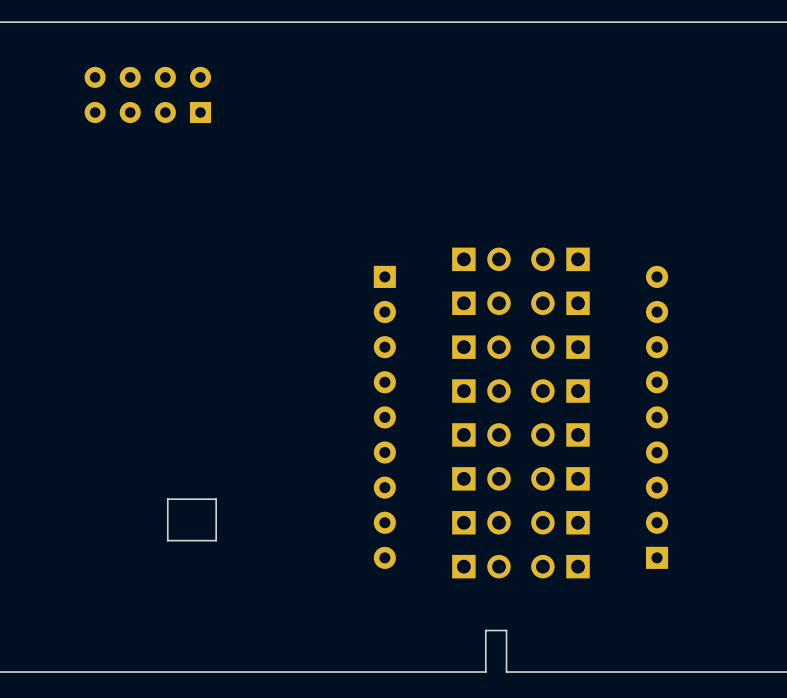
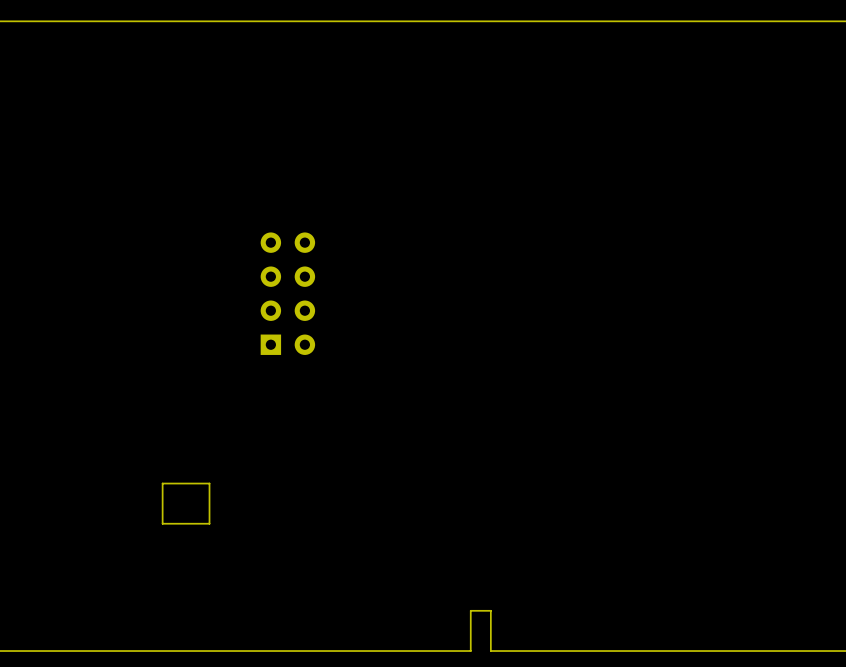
part rotation: 0° (147, 94) -> 90° clockwise (287, 293)
part position: (147, 94) -> (287, 293)
part: (481, 259) -> none
part: (560, 259) -> none
part: (481, 303) -> none
part: (560, 303) -> none
part: (481, 347) -> none
part: (560, 347) -> none
part: (481, 391) -> none
part: (560, 391) -> none
part: (384, 417) -> none
part: (657, 417) -> none
part: (481, 434) -> none
part: (560, 434) -> none
part: (481, 478) -> none
part: (560, 478) -> none
part: (481, 522) -> none
part: (560, 522) -> none
part: (481, 566) -> none
part: (560, 566) -> none

